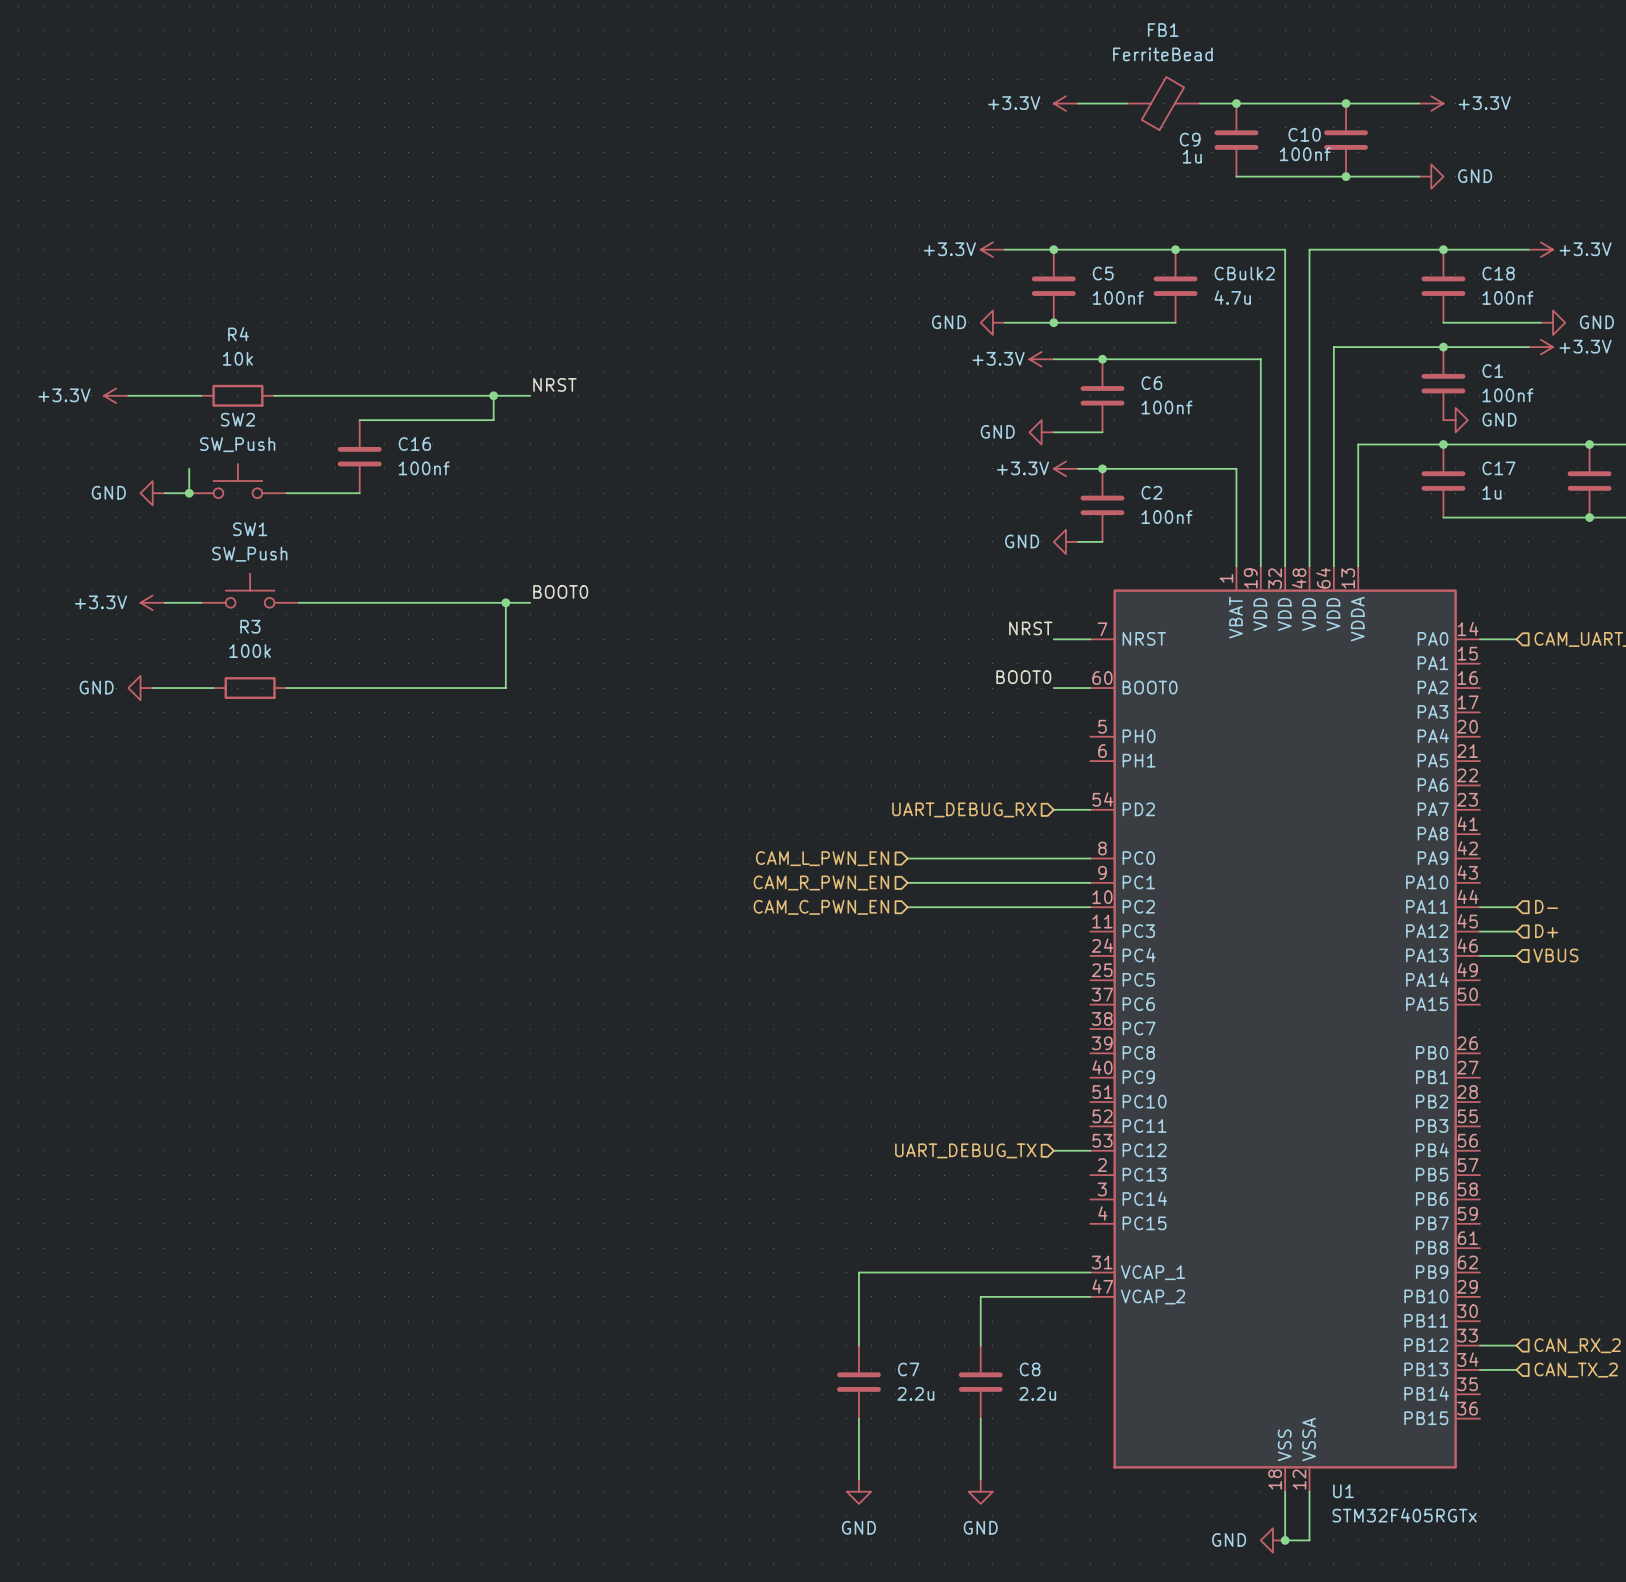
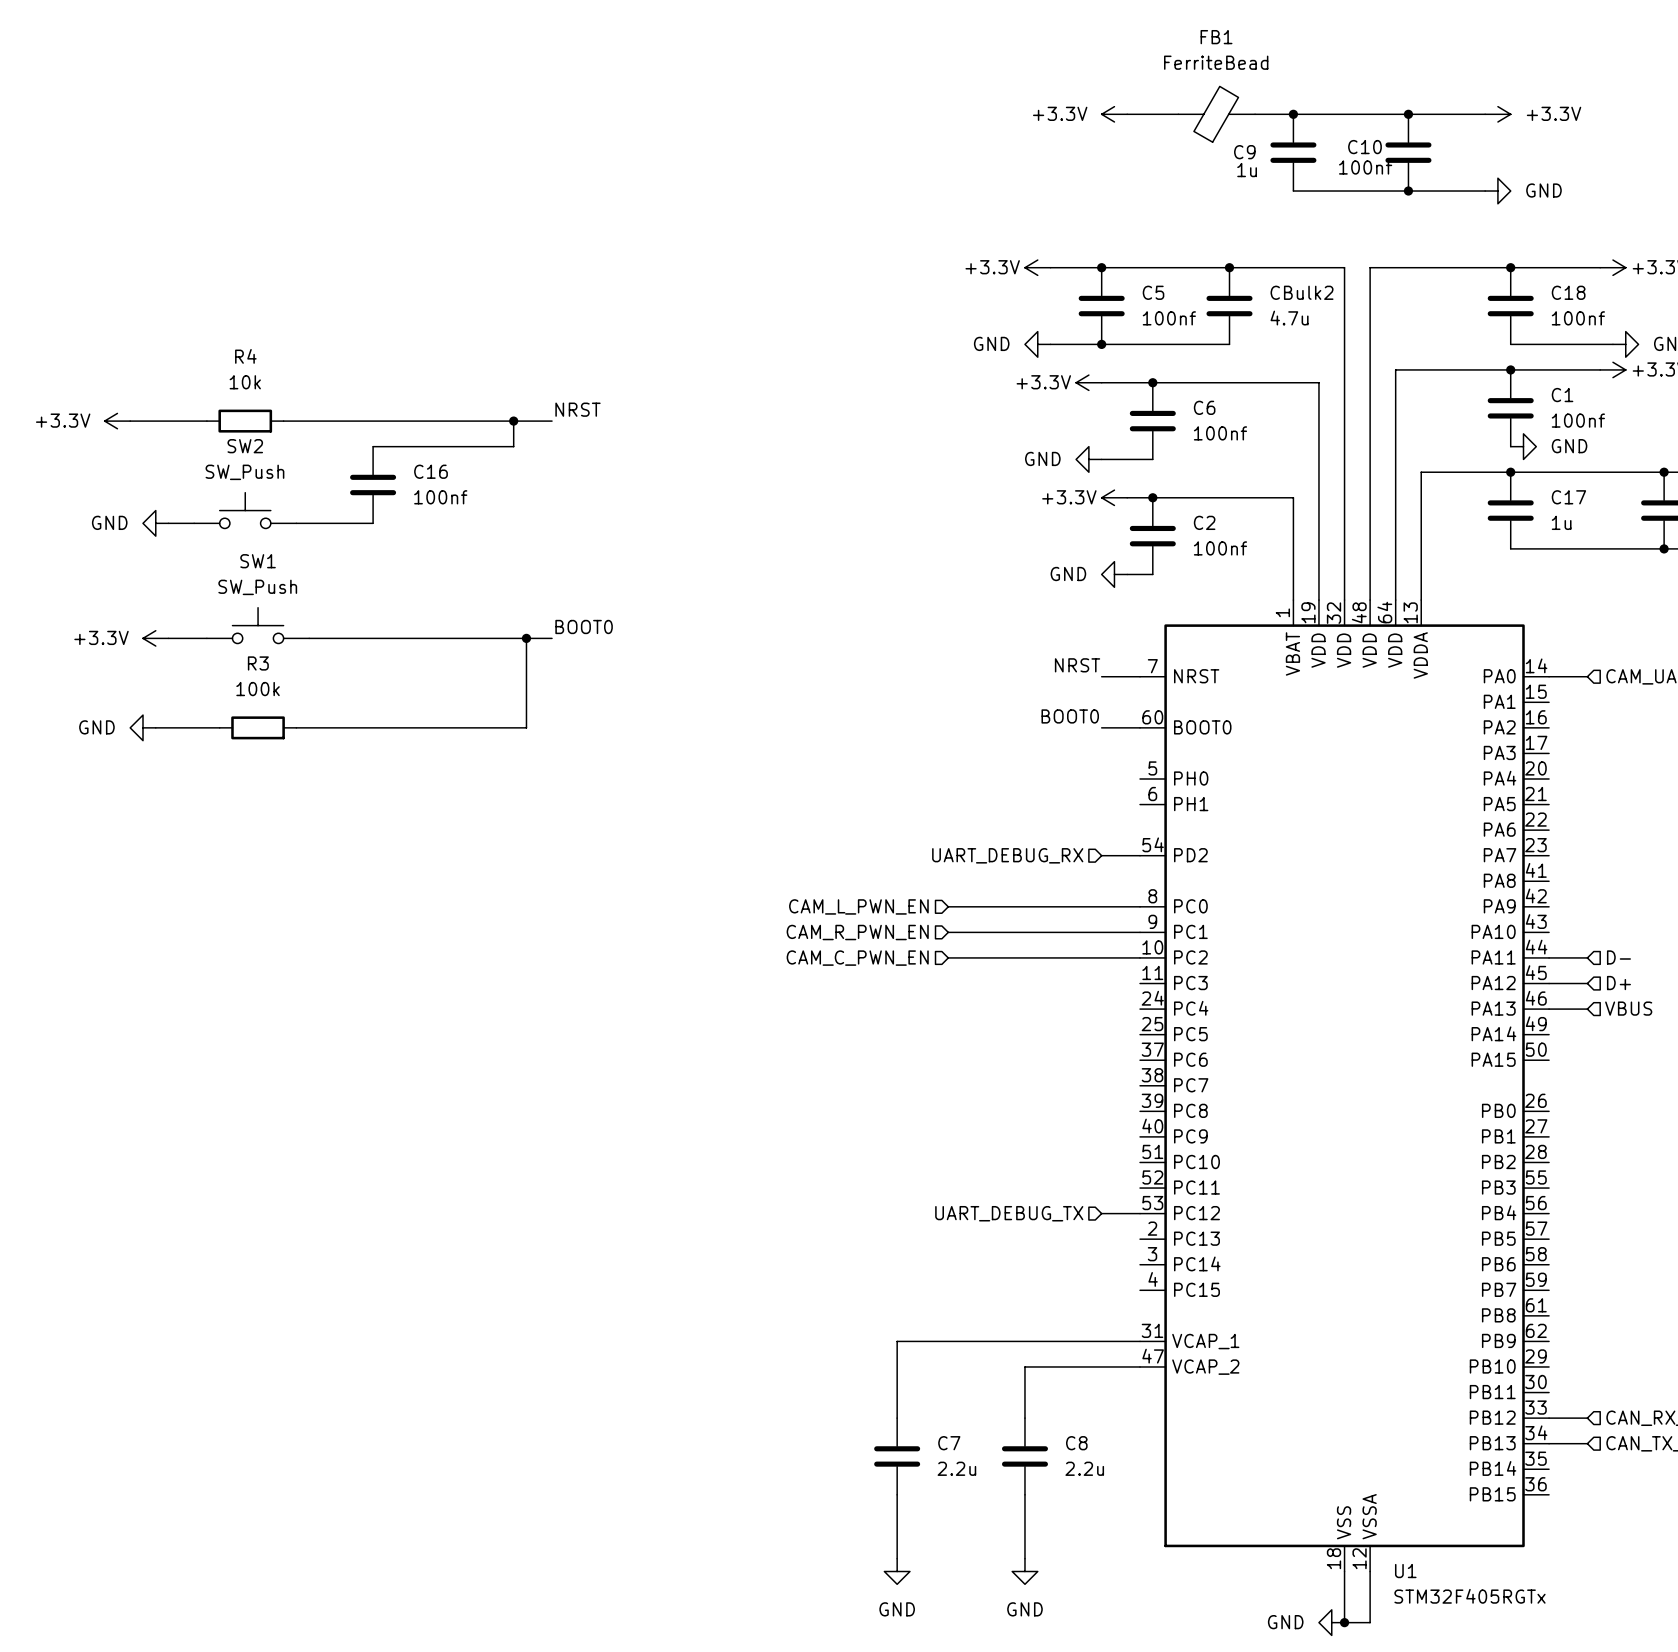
wire: (189, 468) (189, 493) -> none
junction: (189, 493) -> none

